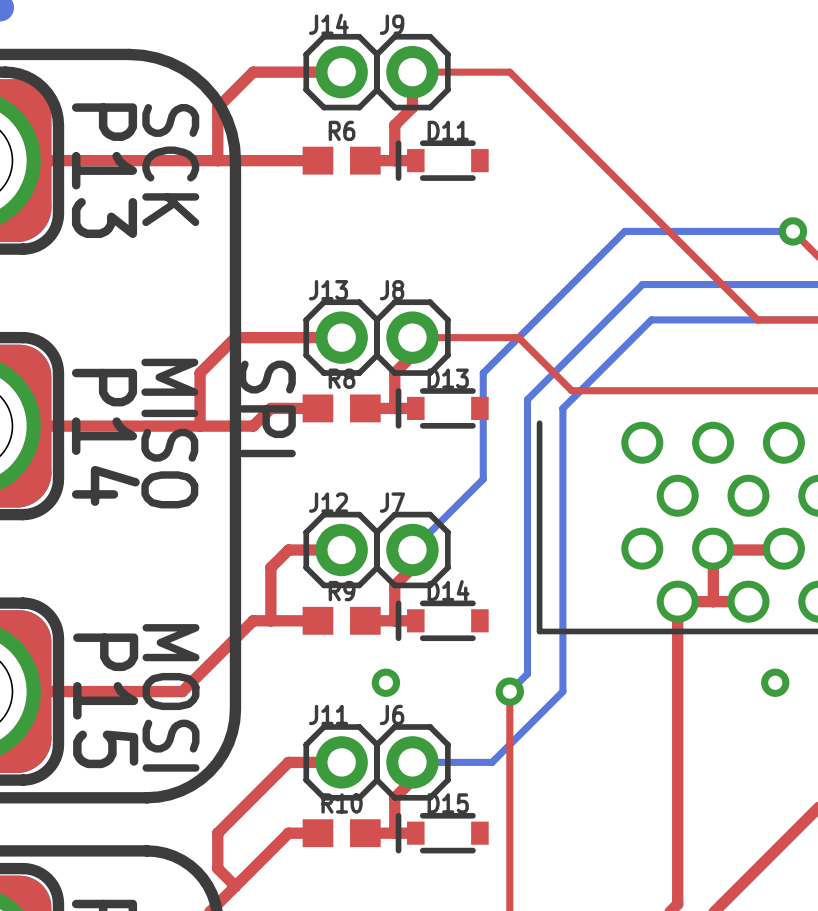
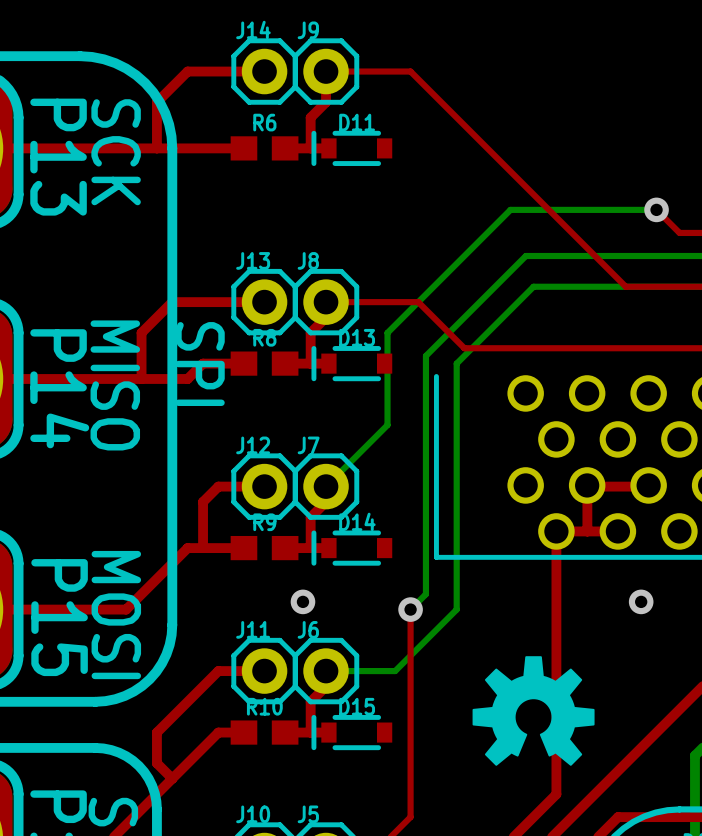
drawing: none -> [472, 656, 595, 766]

